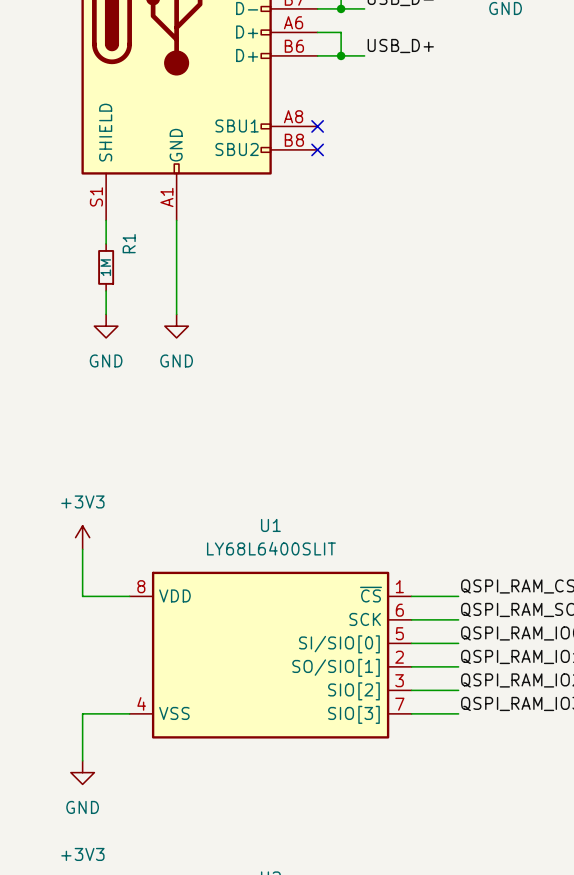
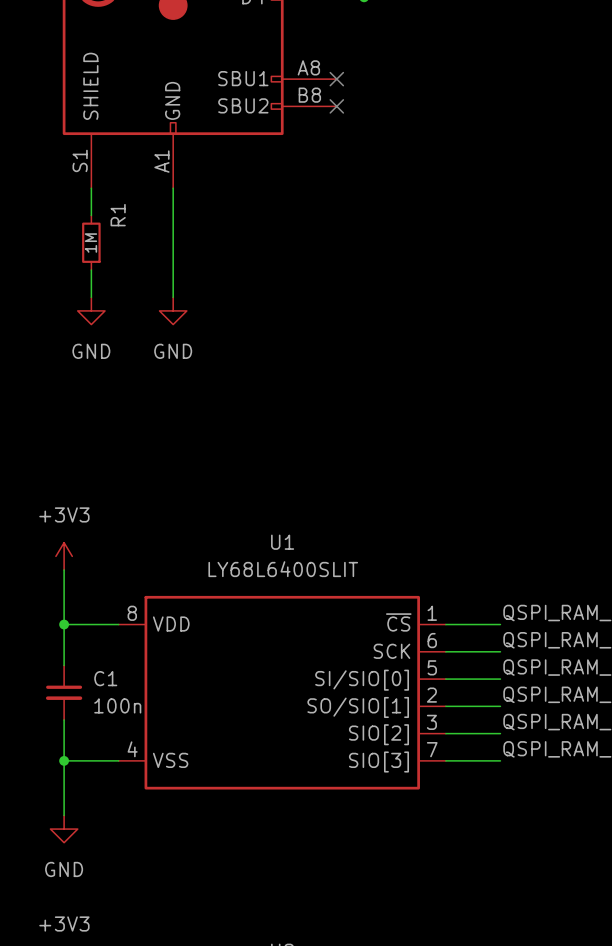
wire: none -> (64, 624) (64, 665)
junction: none -> (64, 624)
C1: none -> 100n (64, 692)
wire: none -> (64, 719) (64, 760)
junction: none -> (64, 760)

